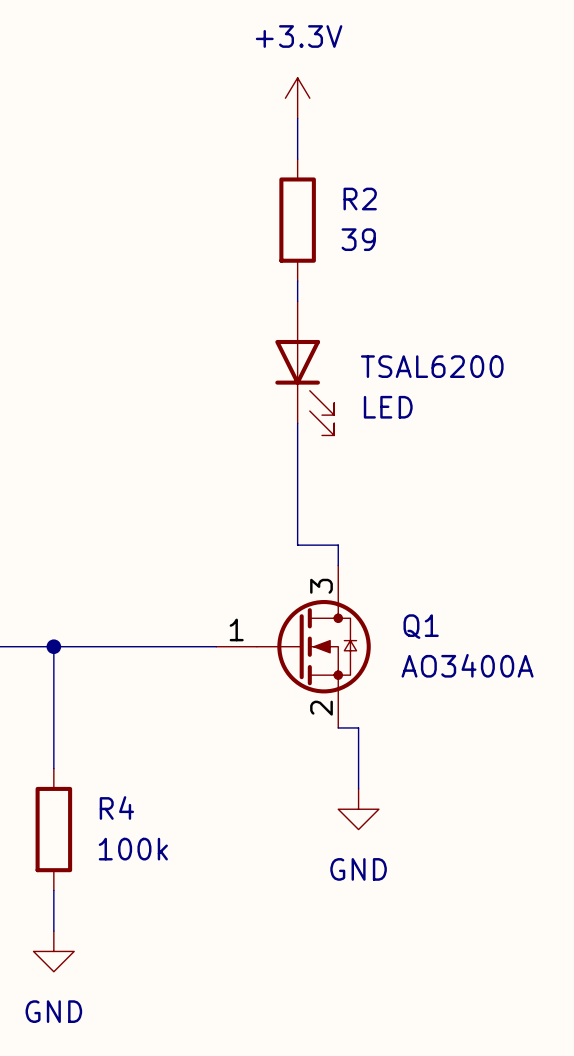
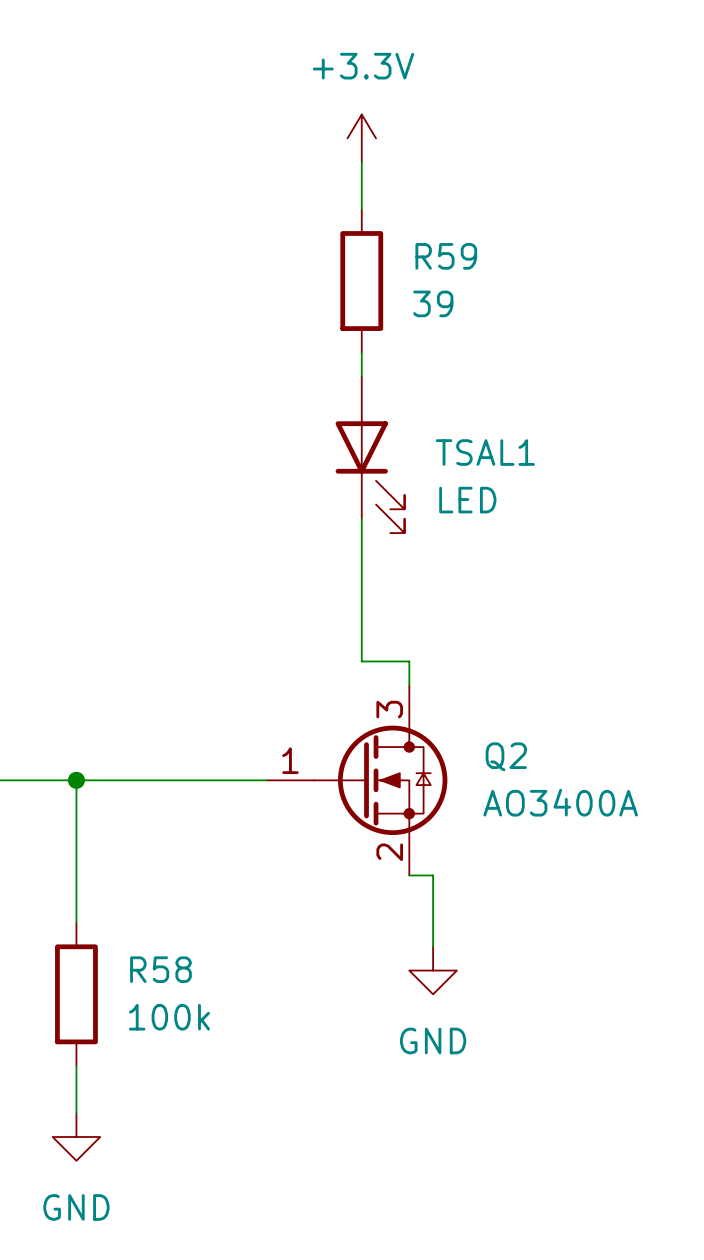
R2 name: R2 (360, 199) -> R59 (446, 256)
TSAL6200 name: TSAL6200 (432, 366) -> TSAL1 (485, 452)
Q1 name: Q1 (421, 626) -> Q2 (506, 756)
R4 name: R4 (116, 807) -> R58 (160, 969)

